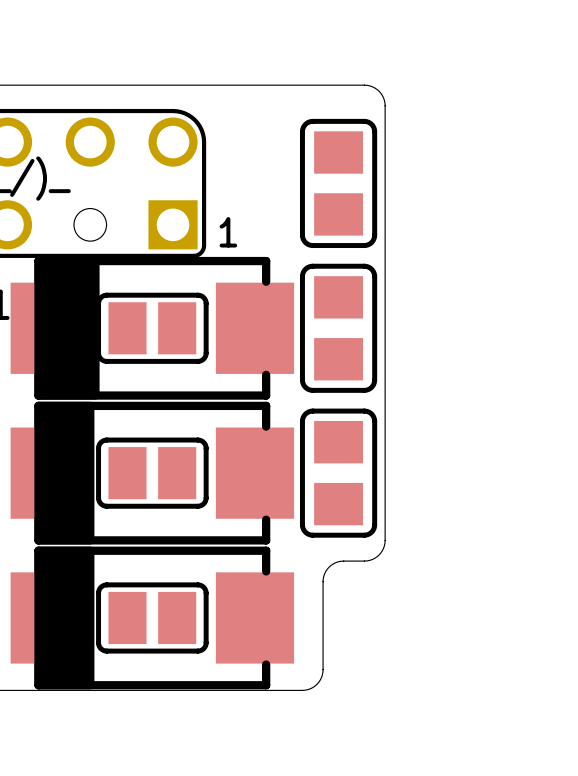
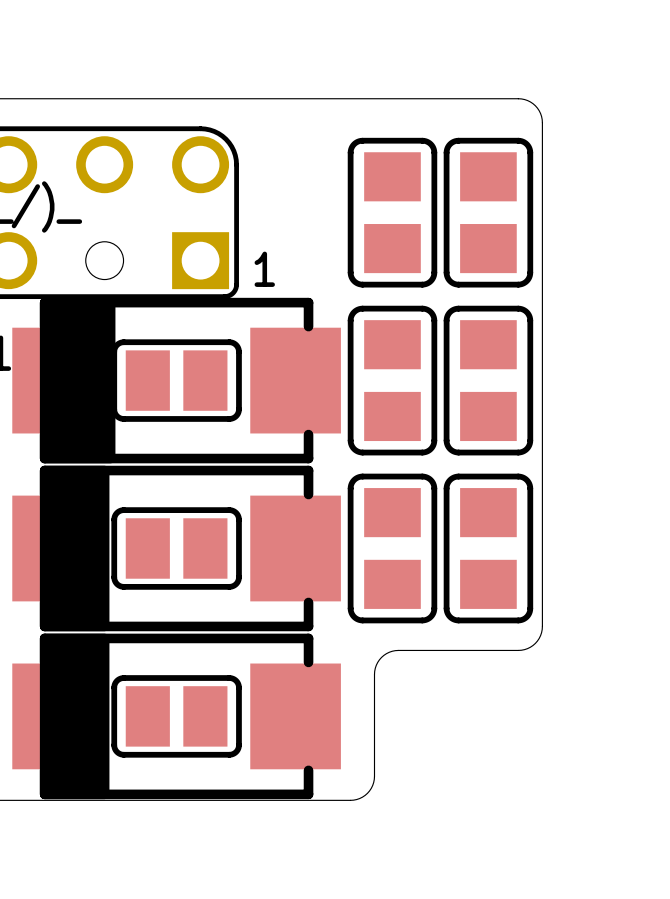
board edge: (364, 85) (372, 86) (379, 91) (383, 97) (385, 105) (385, 540) (383, 548) (379, 555) (372, 559) (364, 561) -> (422, 98) (524, 99) (537, 108) (542, 122) (541, 632) (535, 643) (521, 650) (422, 650)
part: none -> (488, 212)
part: none -> (488, 380)
part: none -> (488, 548)

